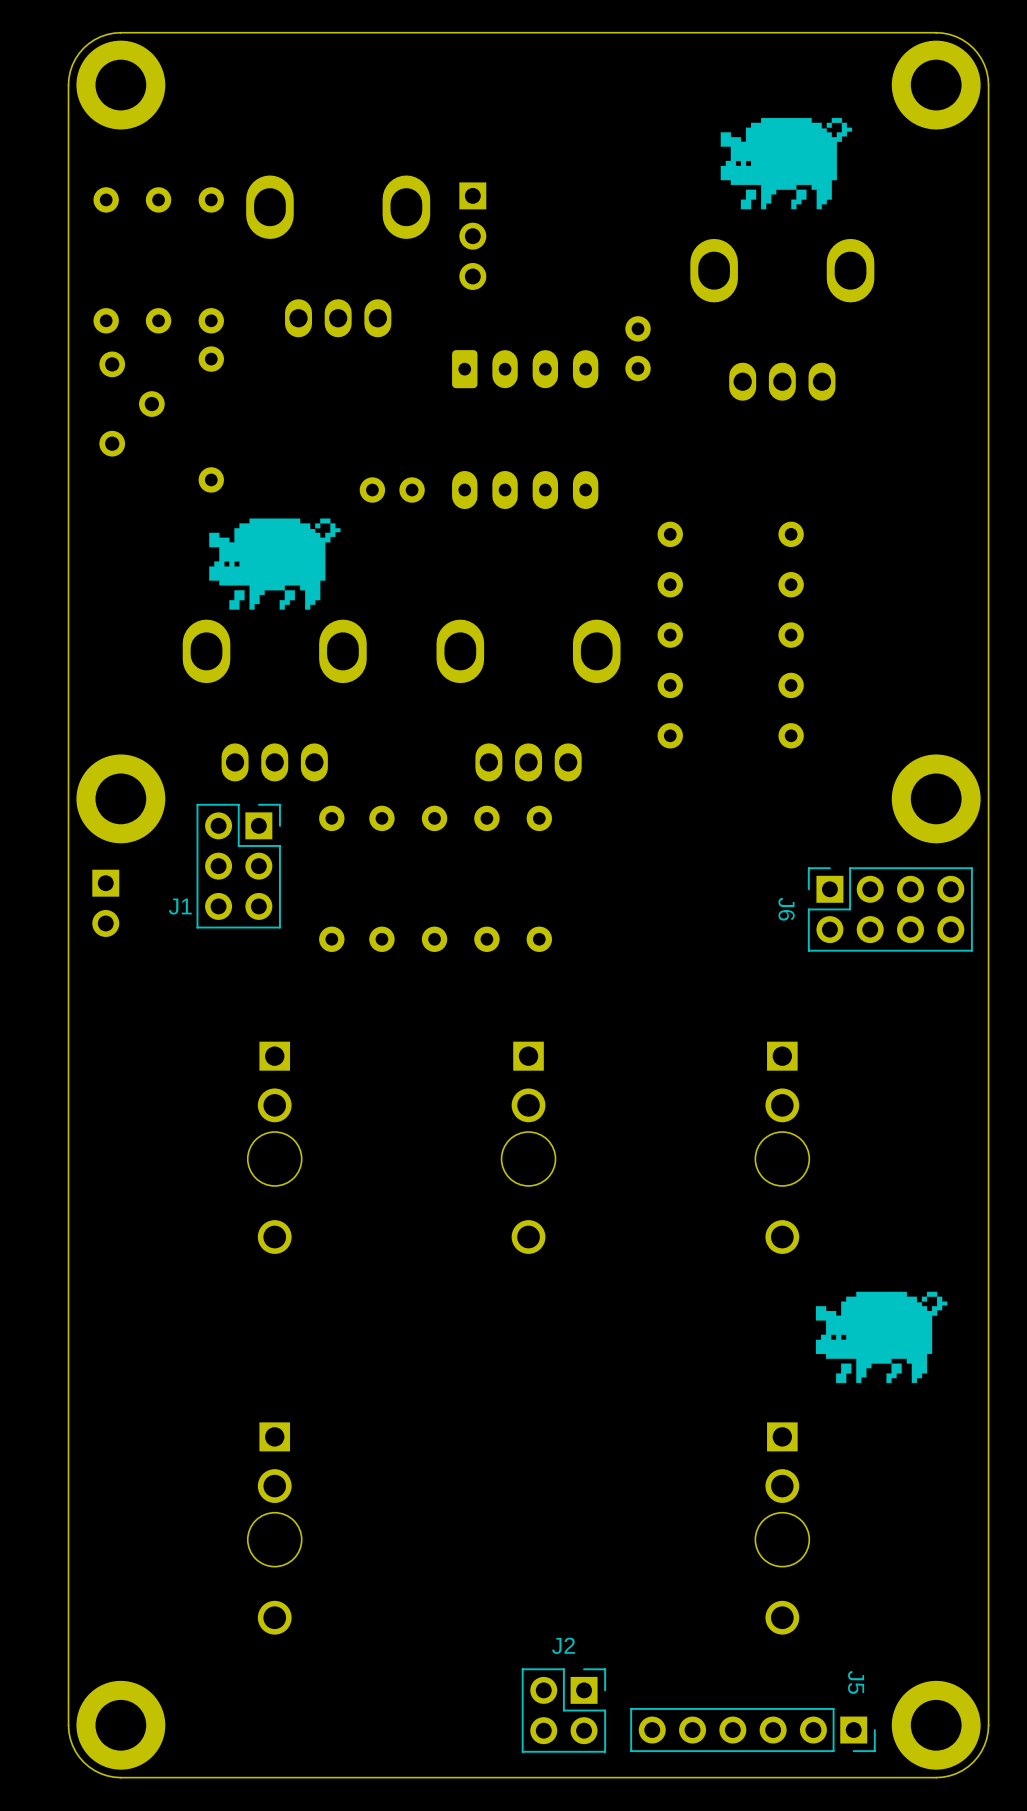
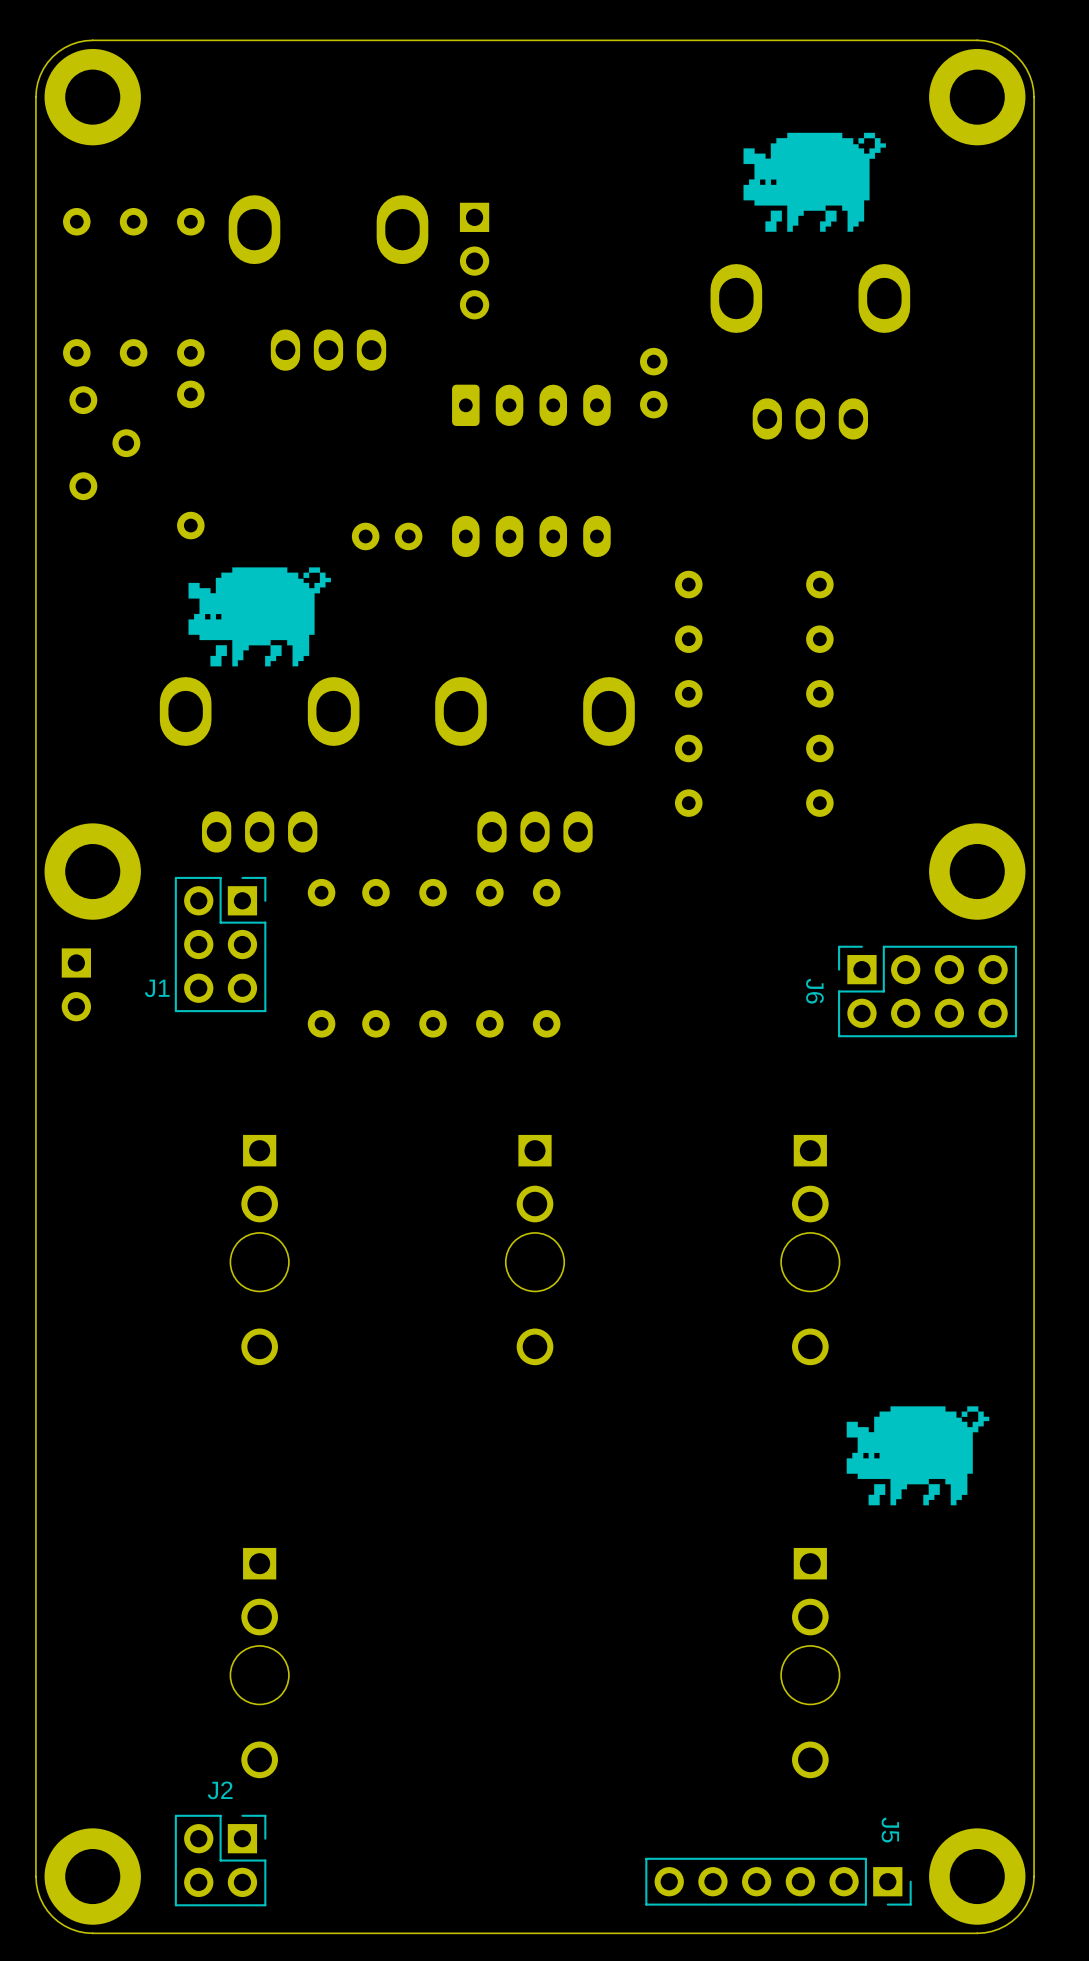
J2 position: (563, 1710) -> (220, 1860)

